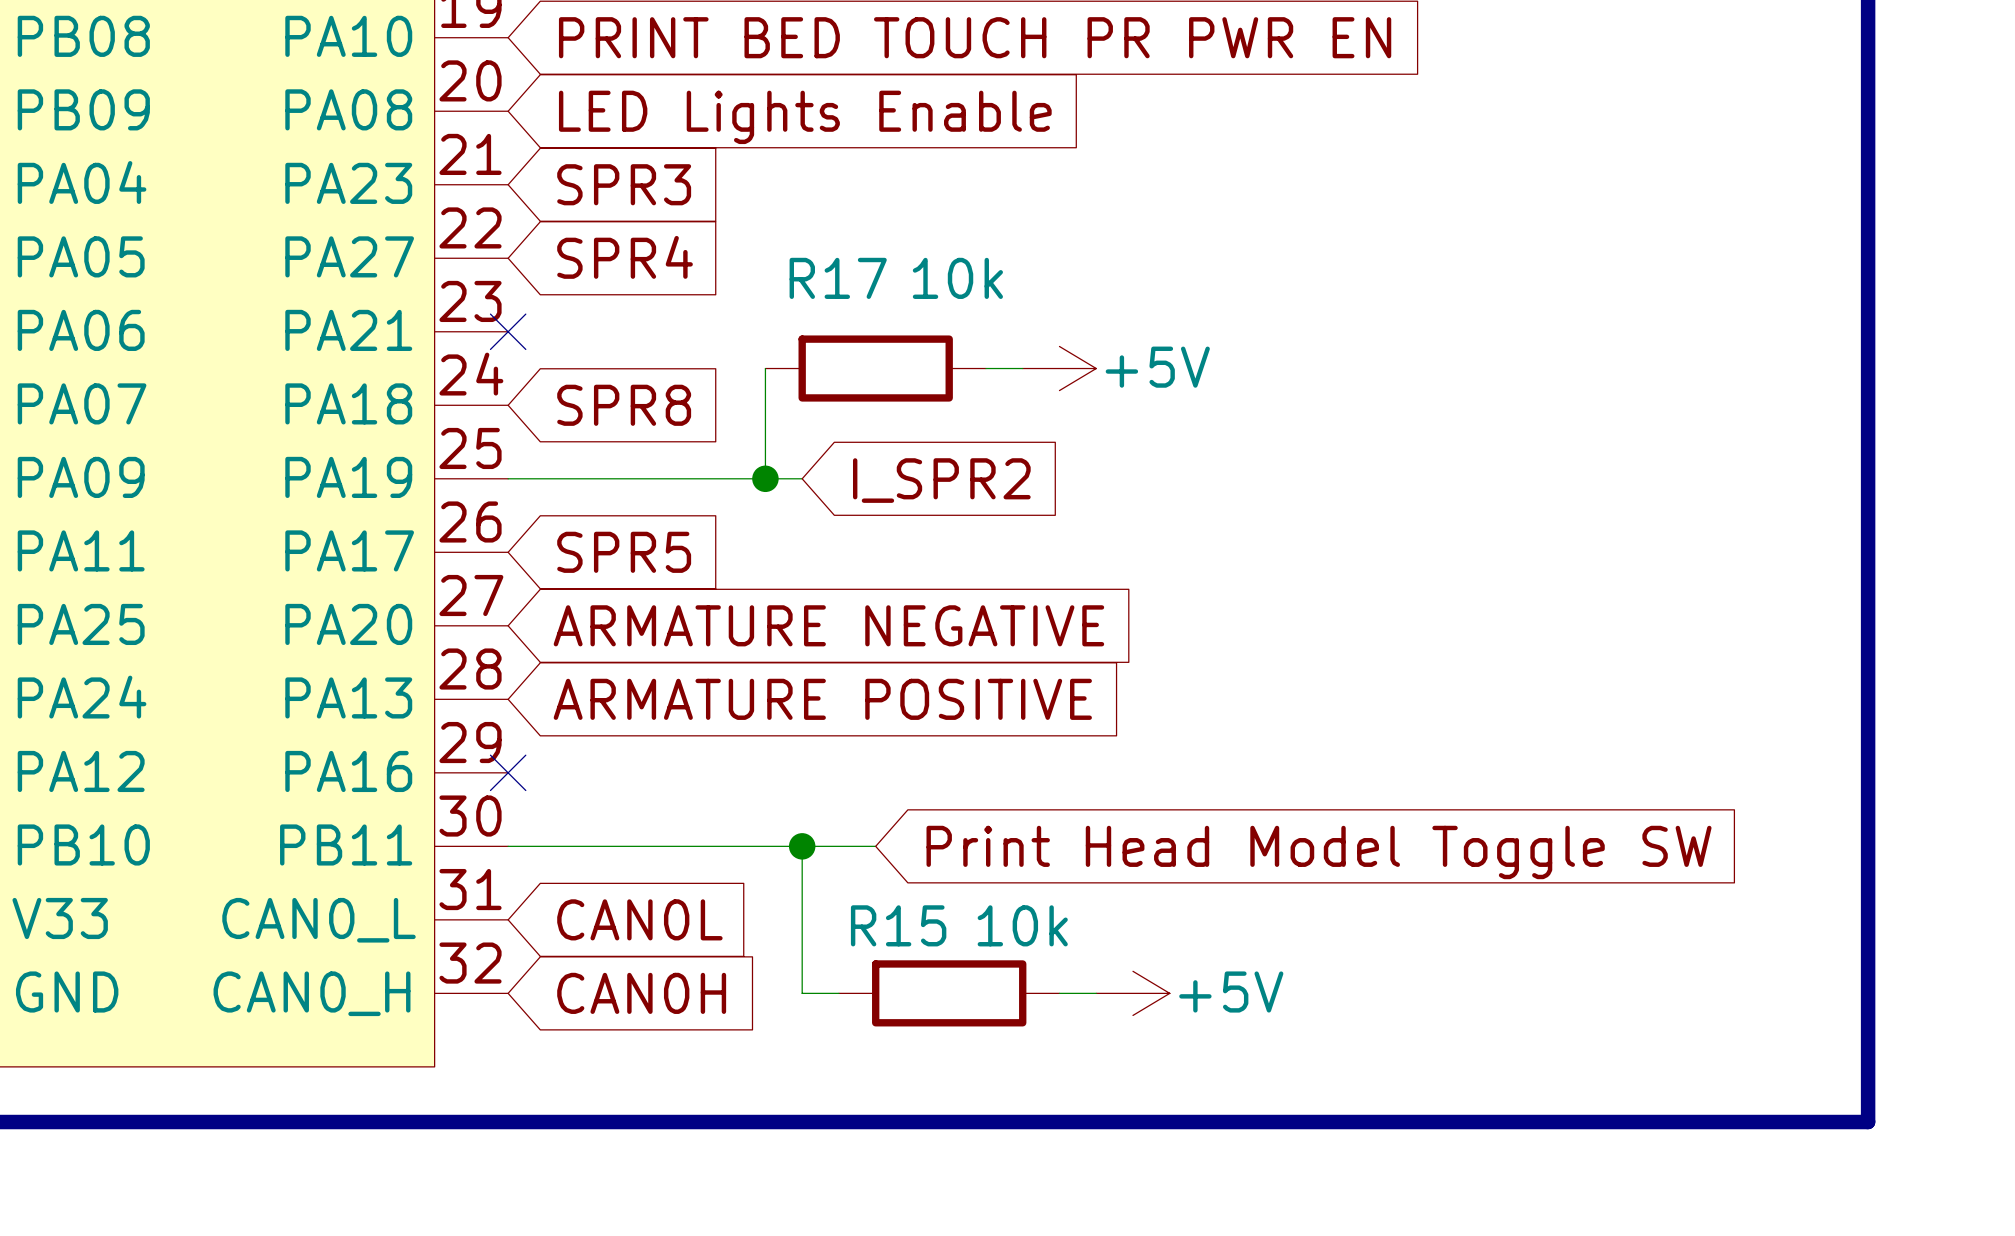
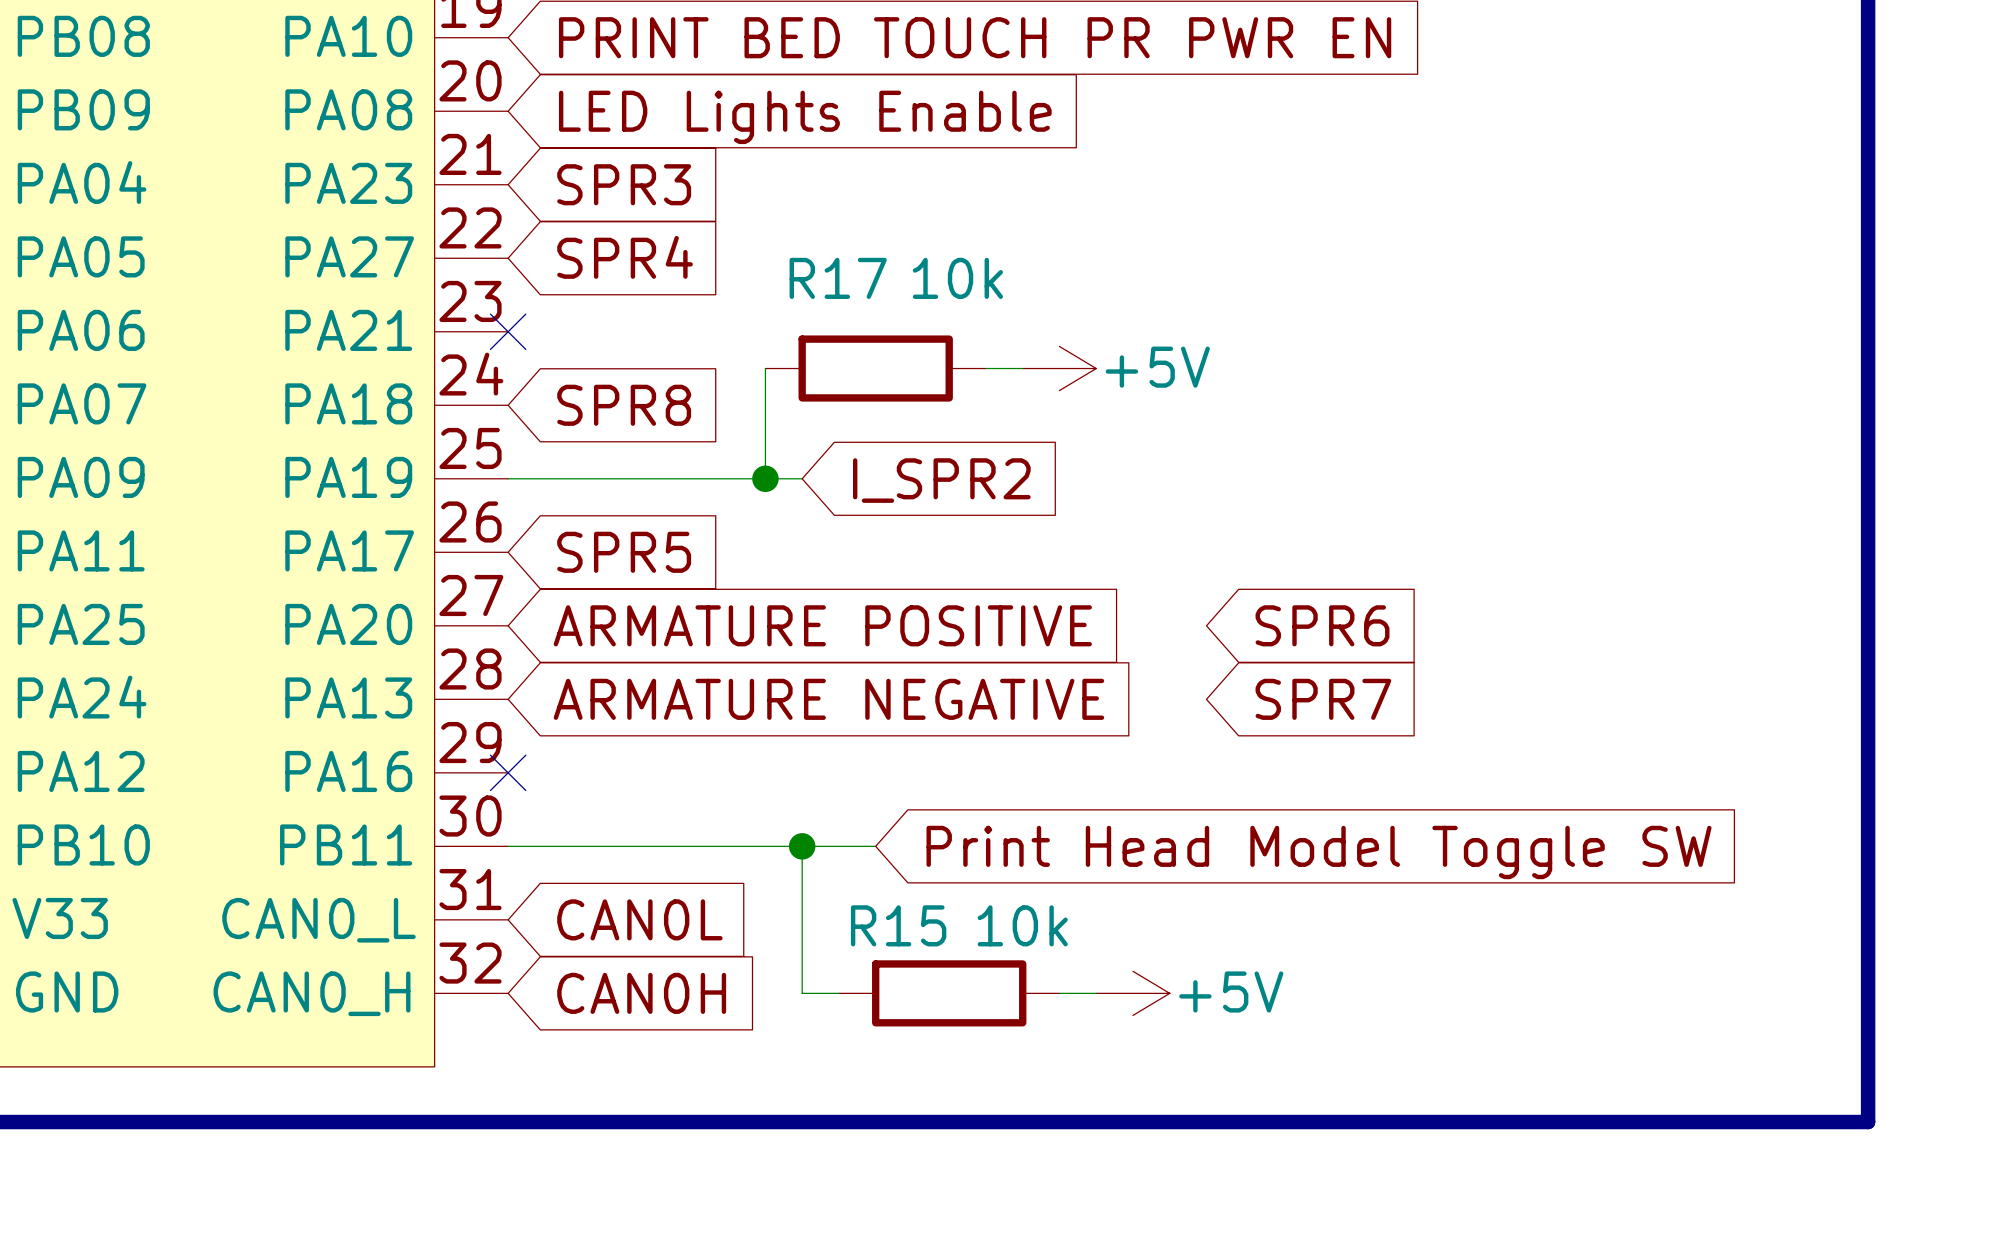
global label: ARMATURE NEGATIVE (828, 625) -> ARMATURE POSITIVE (822, 625)
global label: none -> SPR6 (1322, 625)
global label: ARMATURE POSITIVE (822, 699) -> ARMATURE NEGATIVE (828, 699)
global label: none -> SPR7 (1323, 699)

